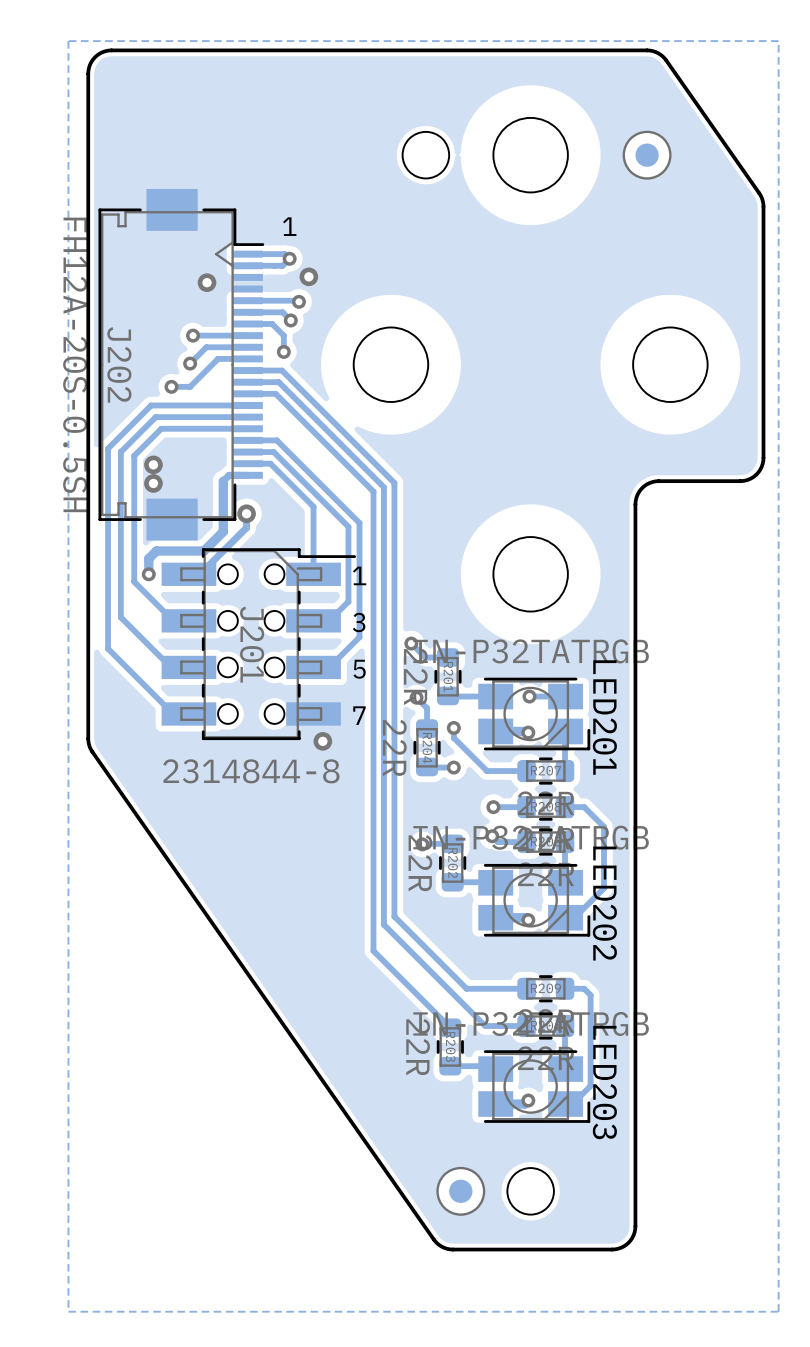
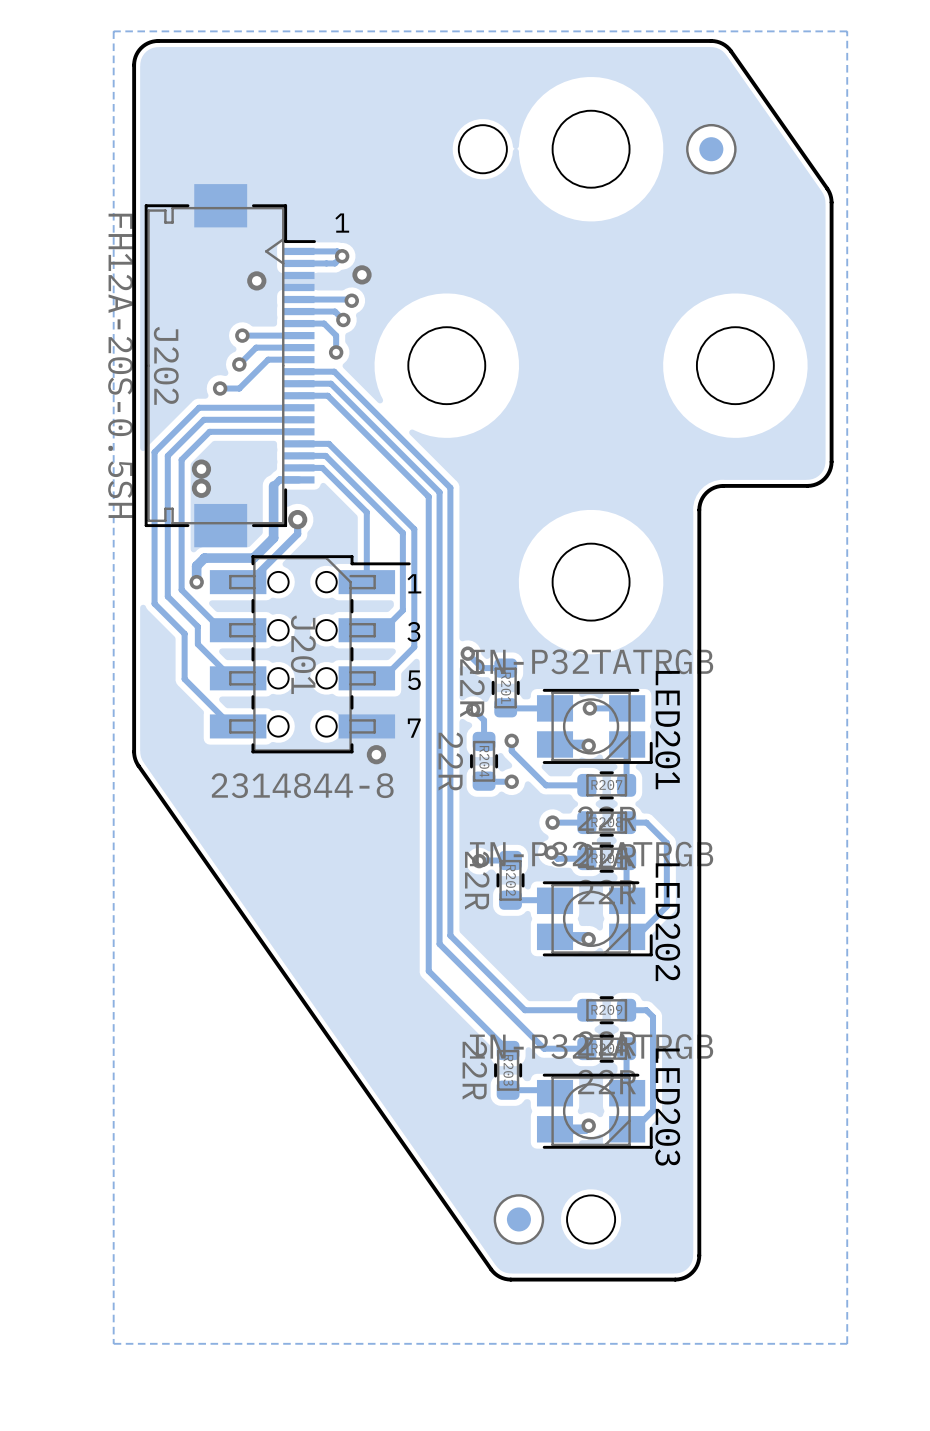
track: (120, 588) (120, 617) (170, 667) (182, 667) -> (167, 596) (197, 626) (197, 644) (231, 678)
track: (108, 595) (108, 648) (173, 714) (182, 714) -> (154, 603) (184, 633) (184, 679) (231, 726)

